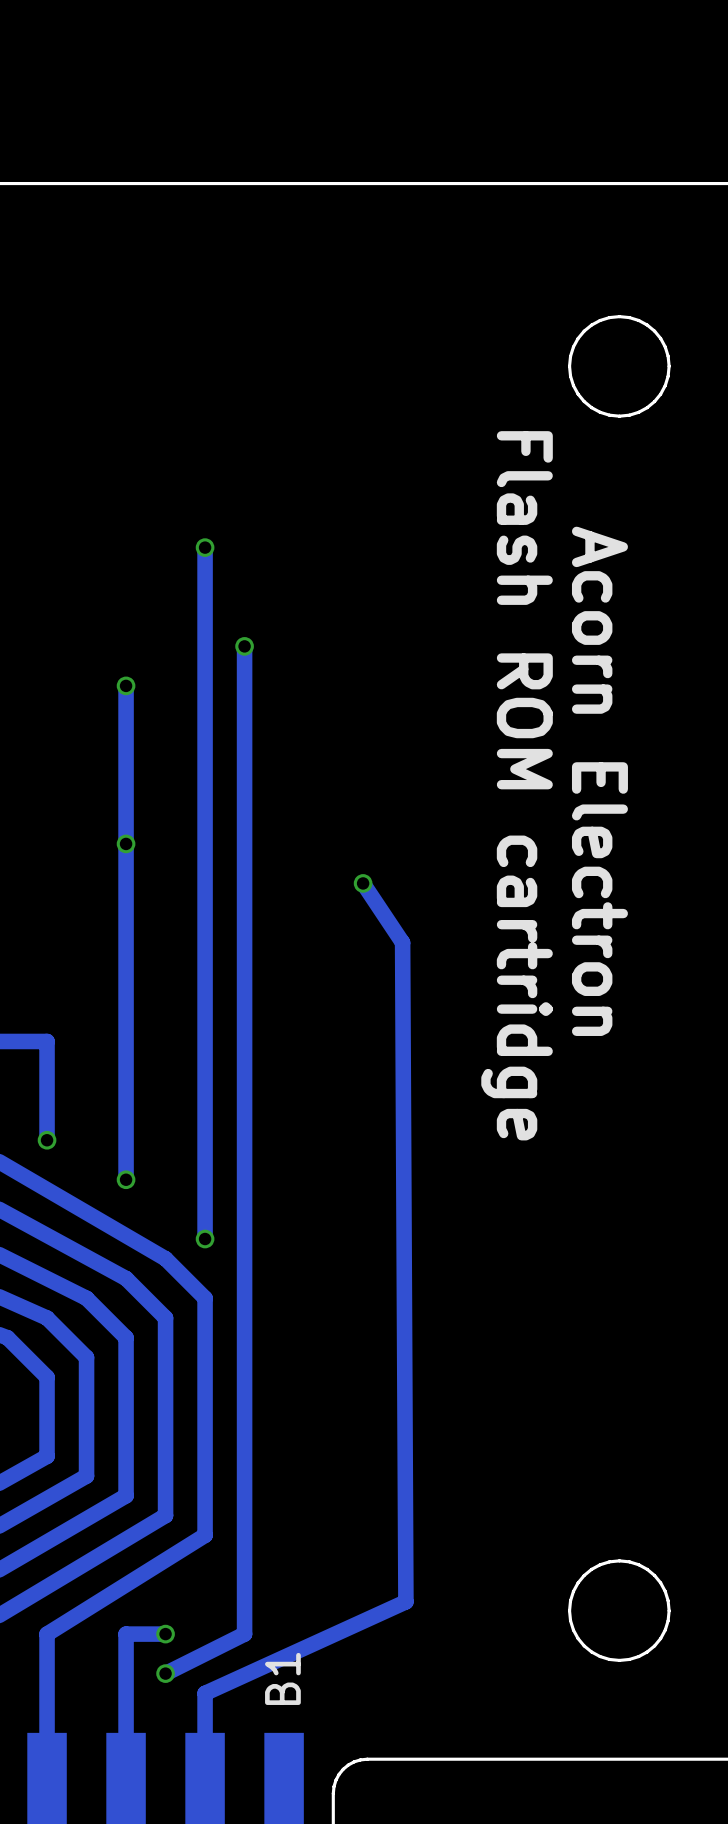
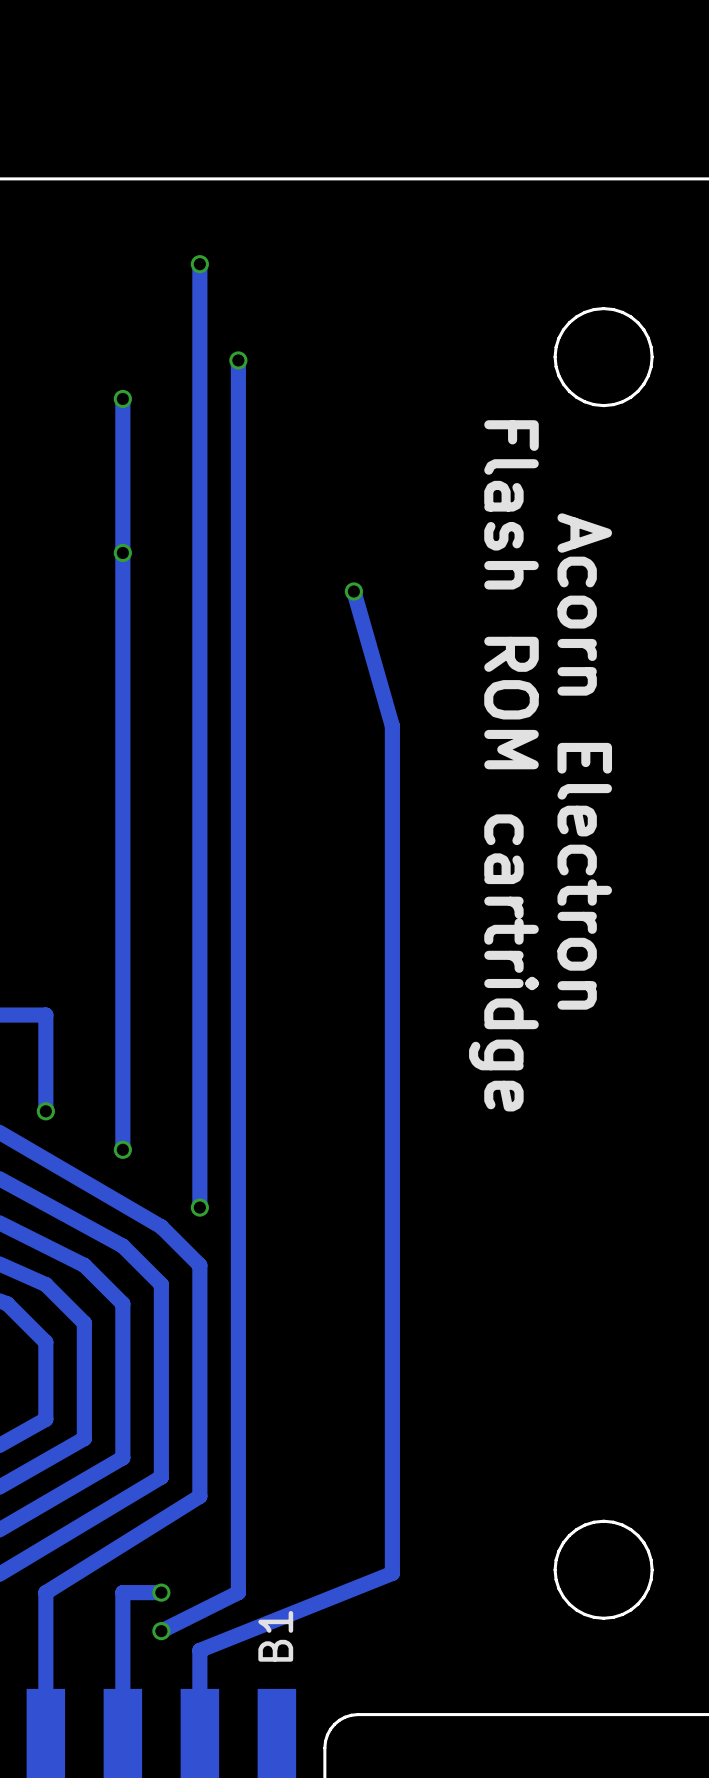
track: none -> (199, 264) (199, 533)
via: none -> (199, 264)
track: none -> (238, 360) (238, 629)
via: none -> (238, 360)
track: none -> (122, 398) (122, 668)
via: none -> (122, 398)
via: (205, 547) -> none
via: none -> (122, 552)
via: none -> (353, 591)
via: (244, 646) -> none
via: (126, 685) -> none
via: (126, 843) -> none
track: (363, 883) (402, 942) (405, 1601) (205, 1693) -> (353, 591) (392, 726) (392, 1573) (199, 1650)
via: (363, 883) -> none

